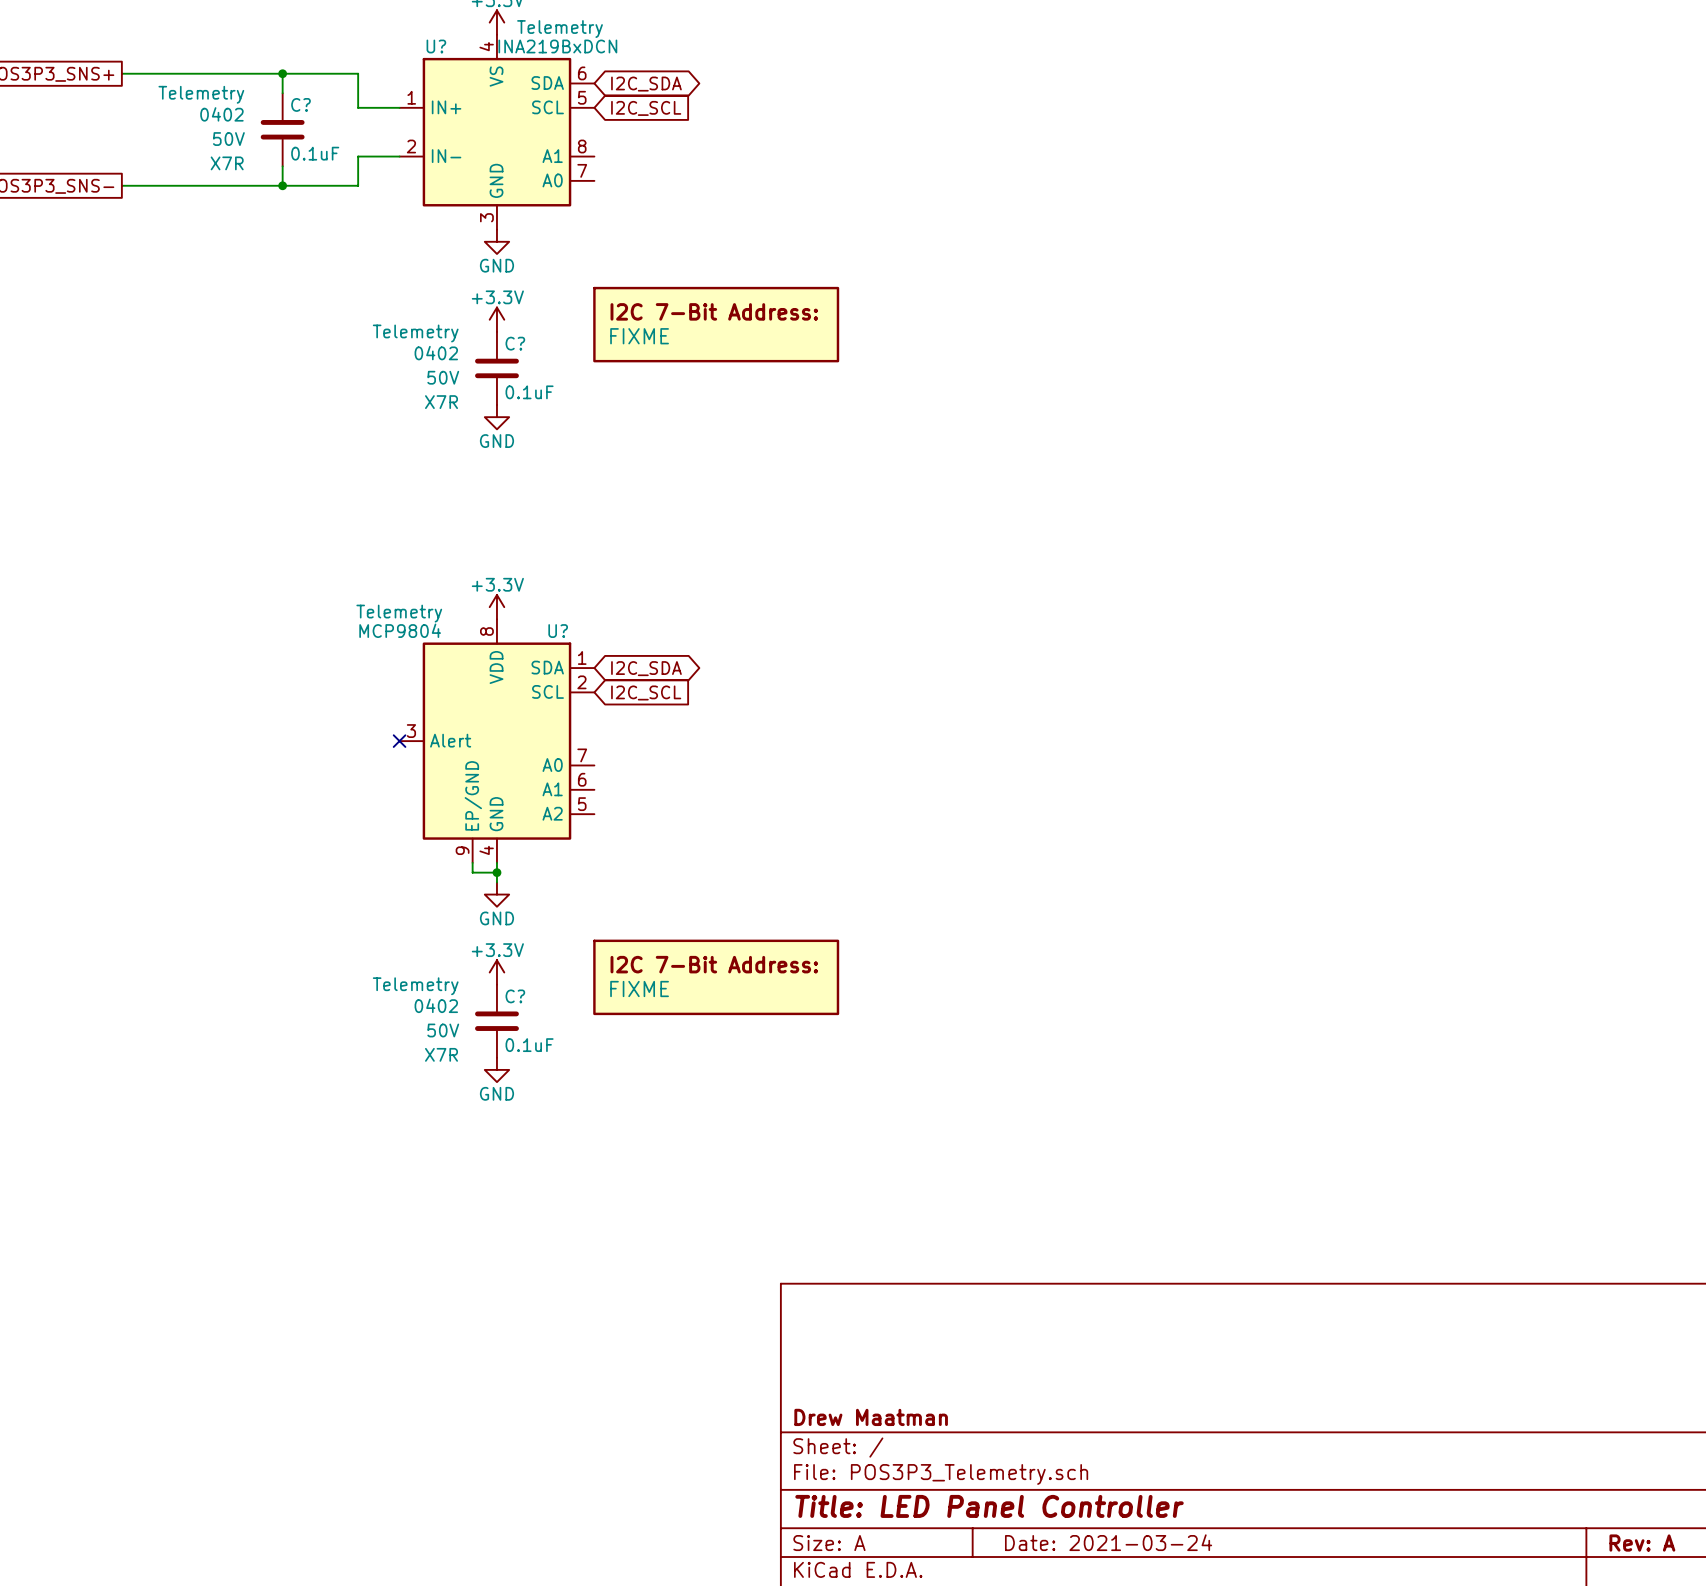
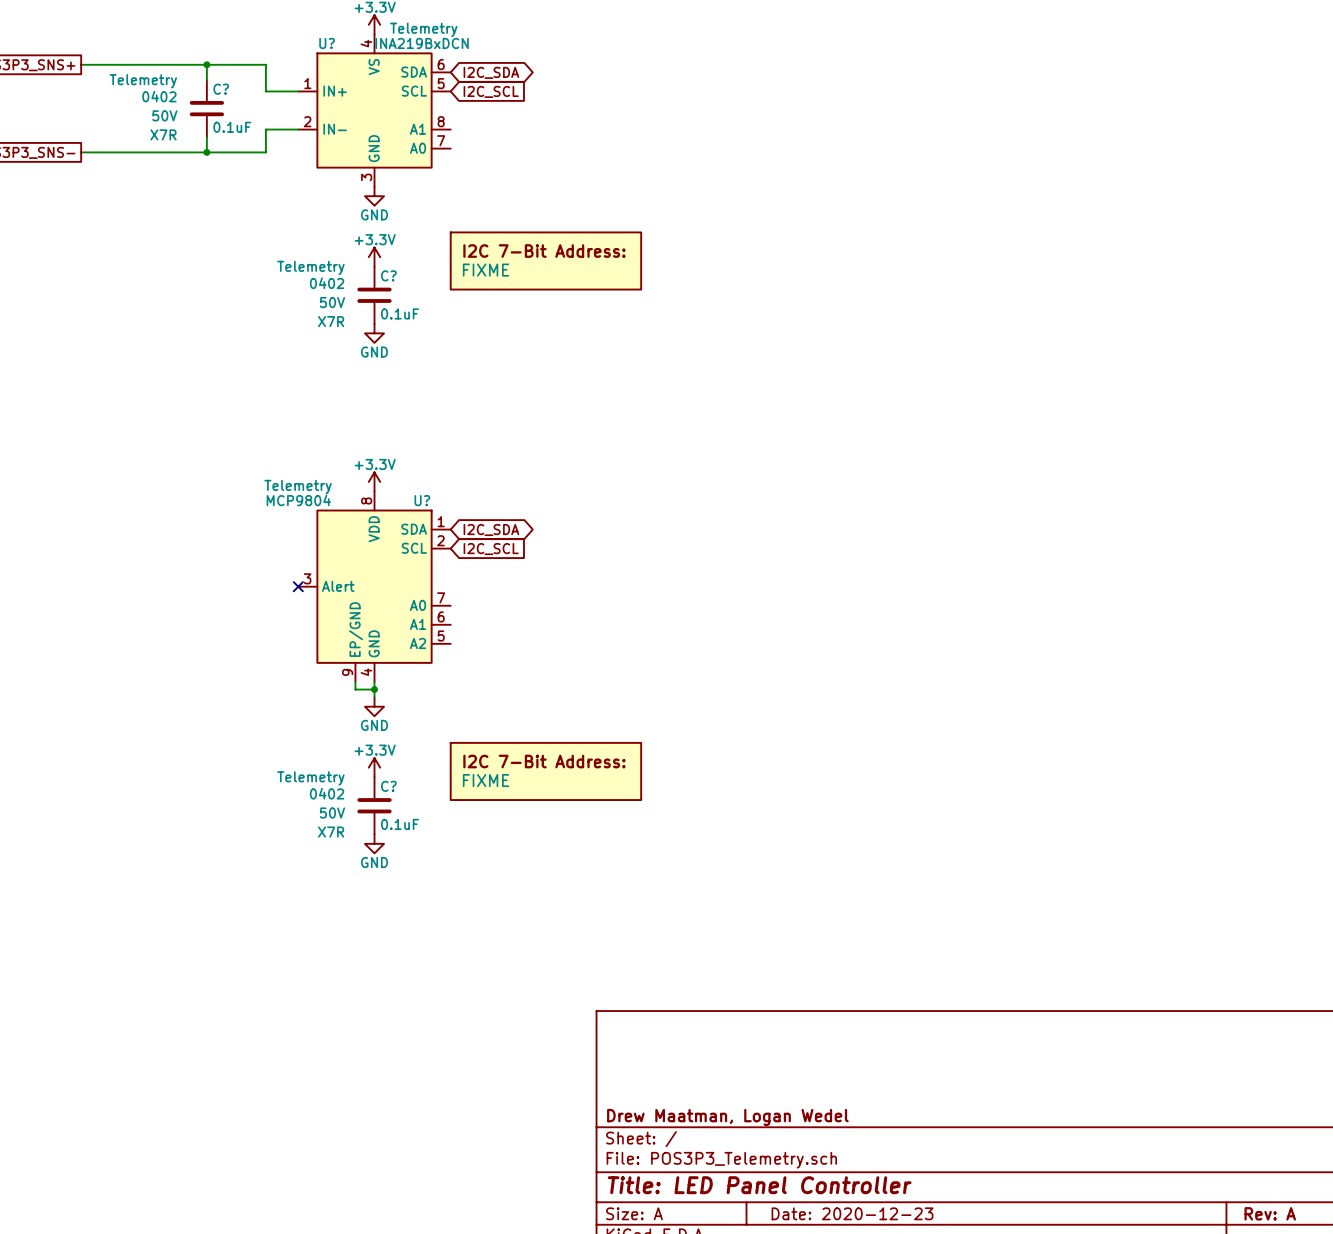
title block: Drew Maatman (871, 1417) -> Drew Maatman, Logan Wedel (727, 1117)
title block: Date: 2021-03-24 (1108, 1542) -> Date: 2020-12-23 (852, 1213)

